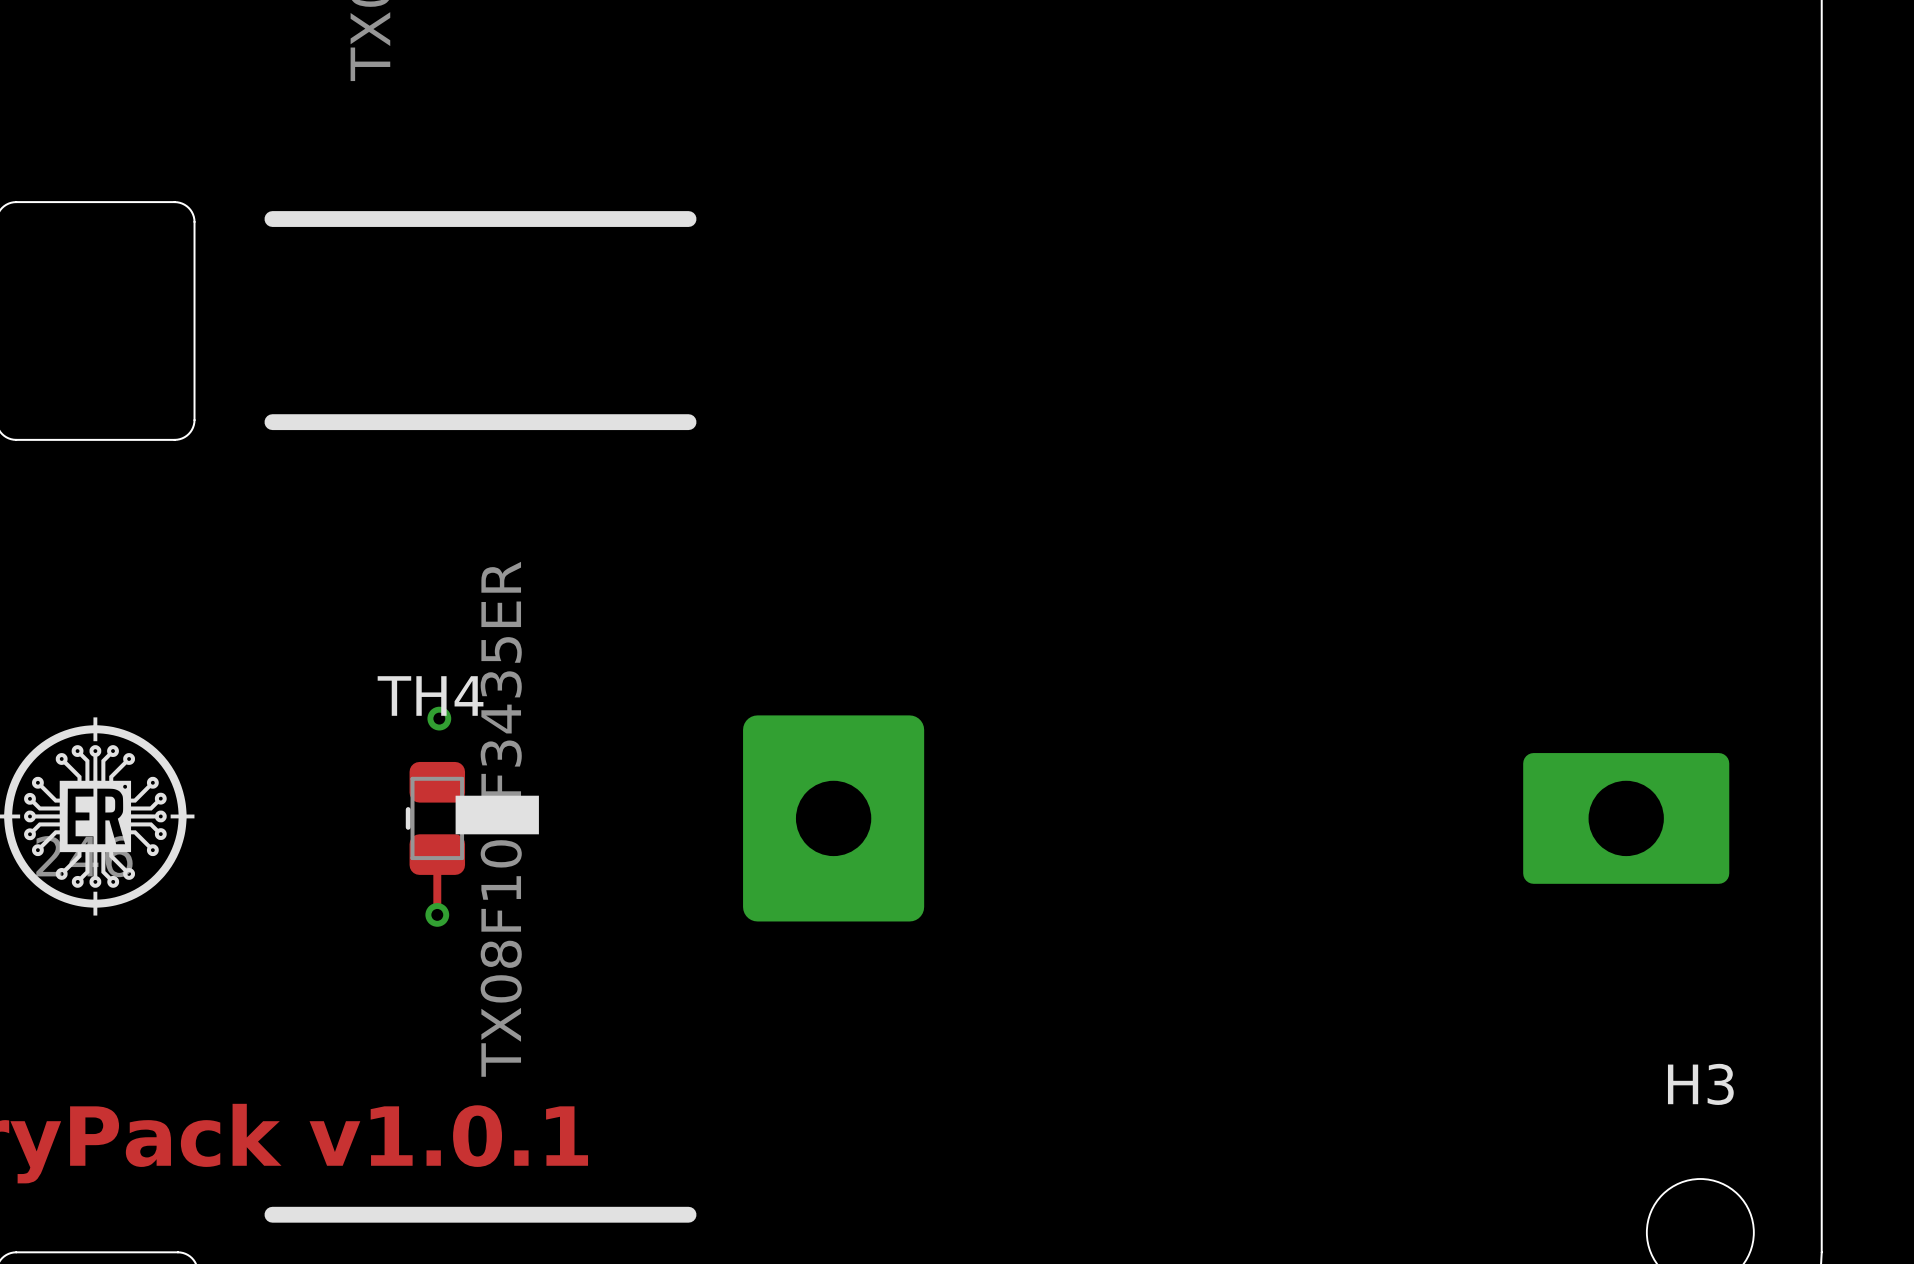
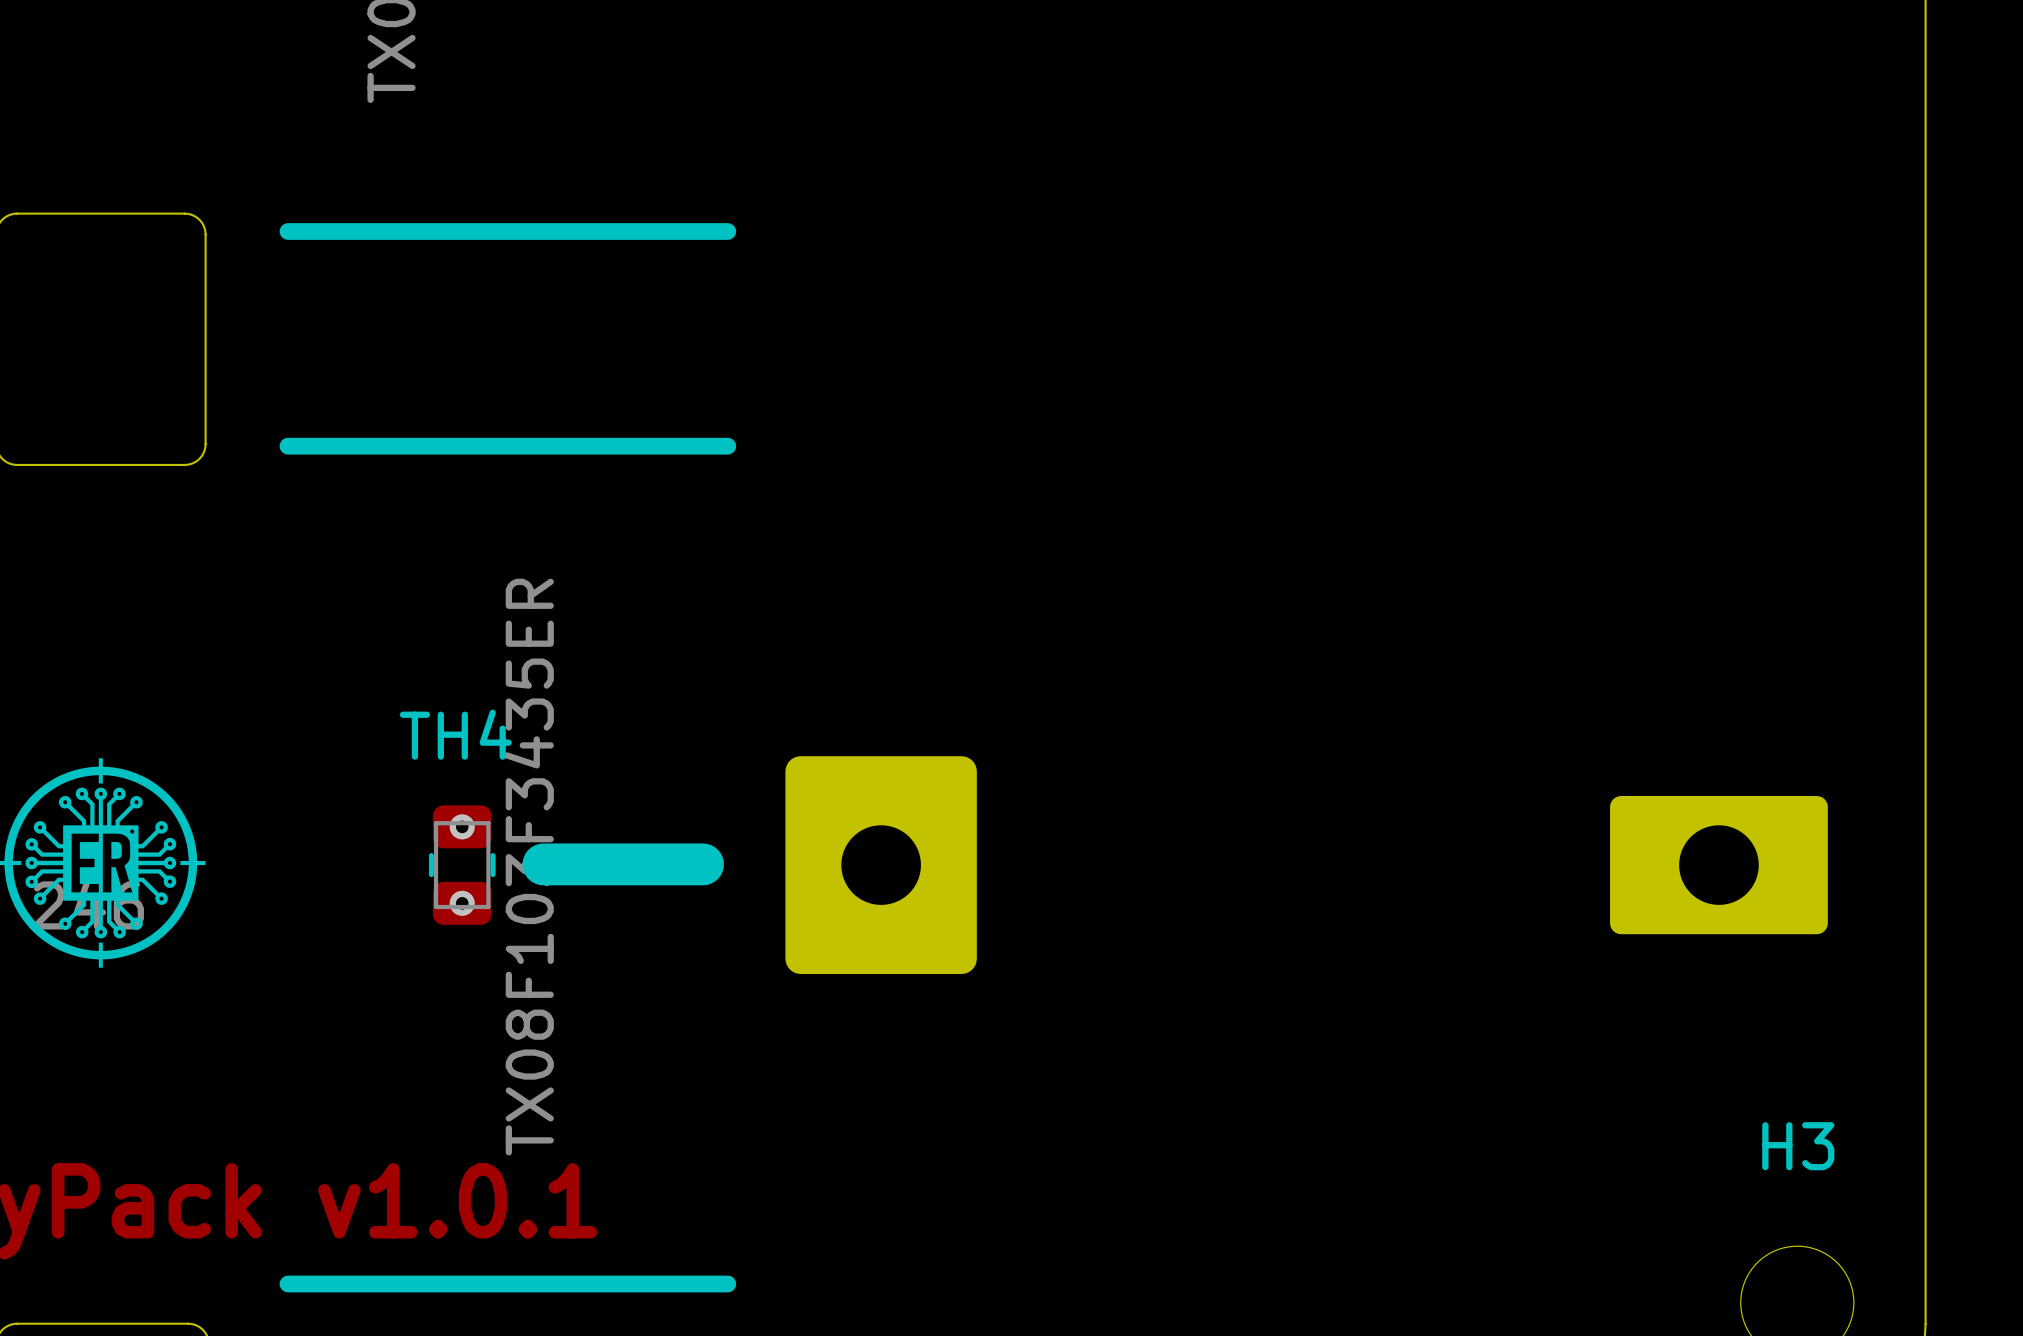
via position: (439, 718) -> (462, 826)
track: (437, 854) (437, 914) -> none
via position: (437, 914) -> (462, 903)

